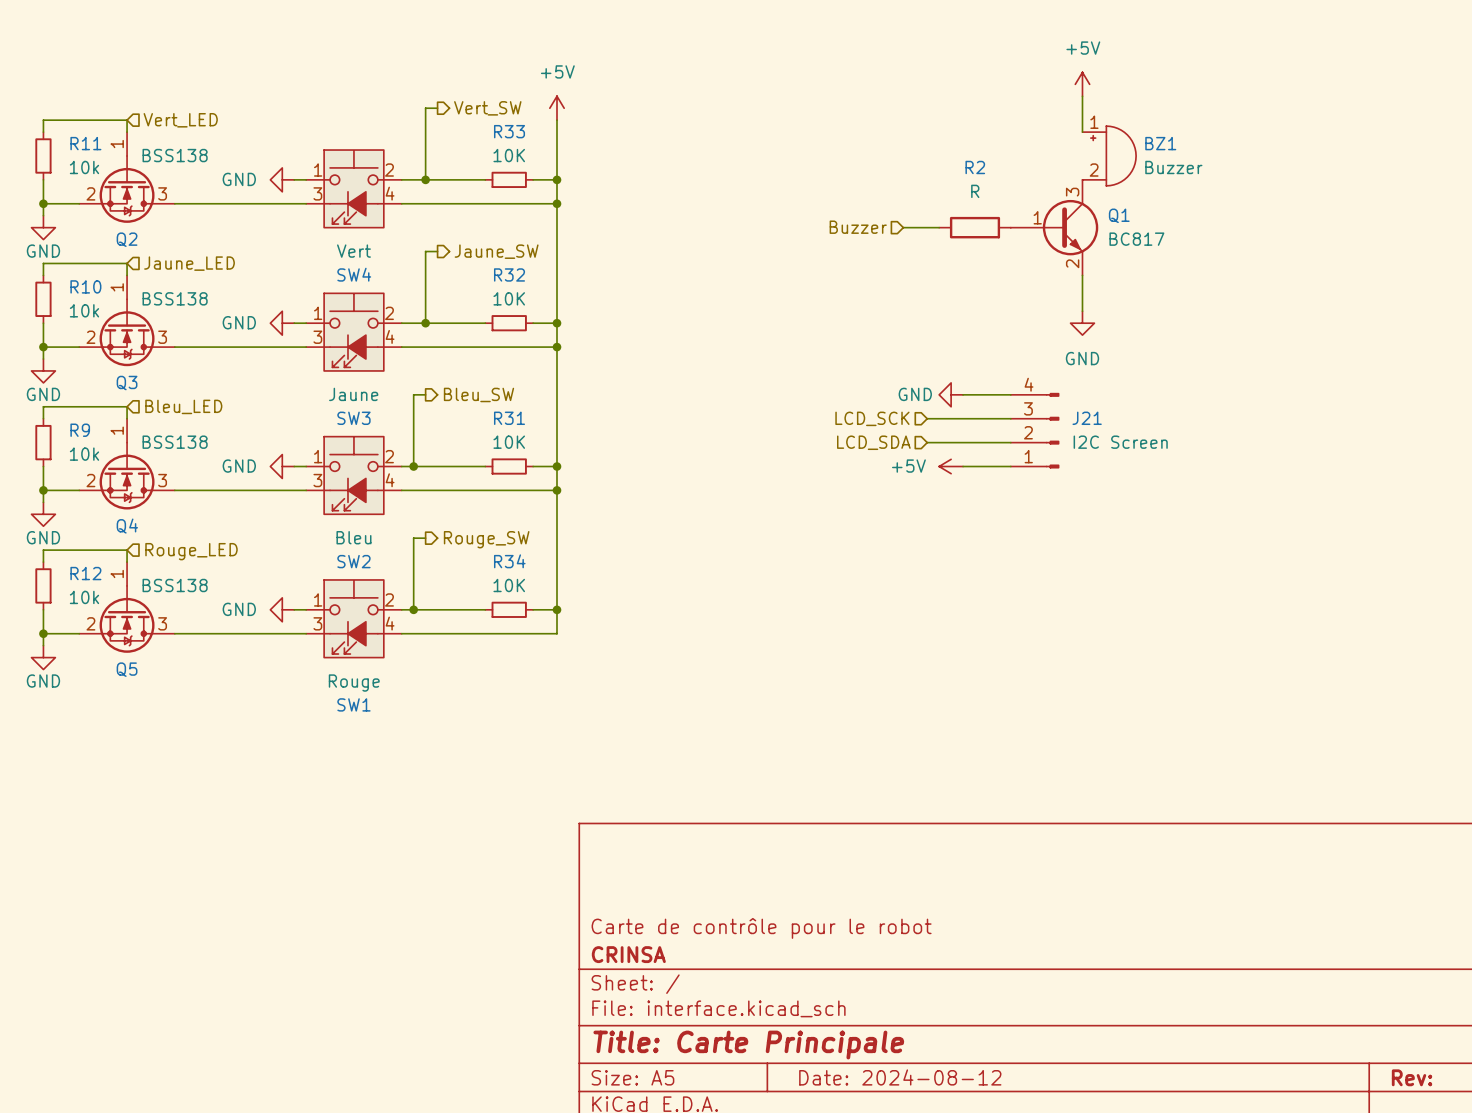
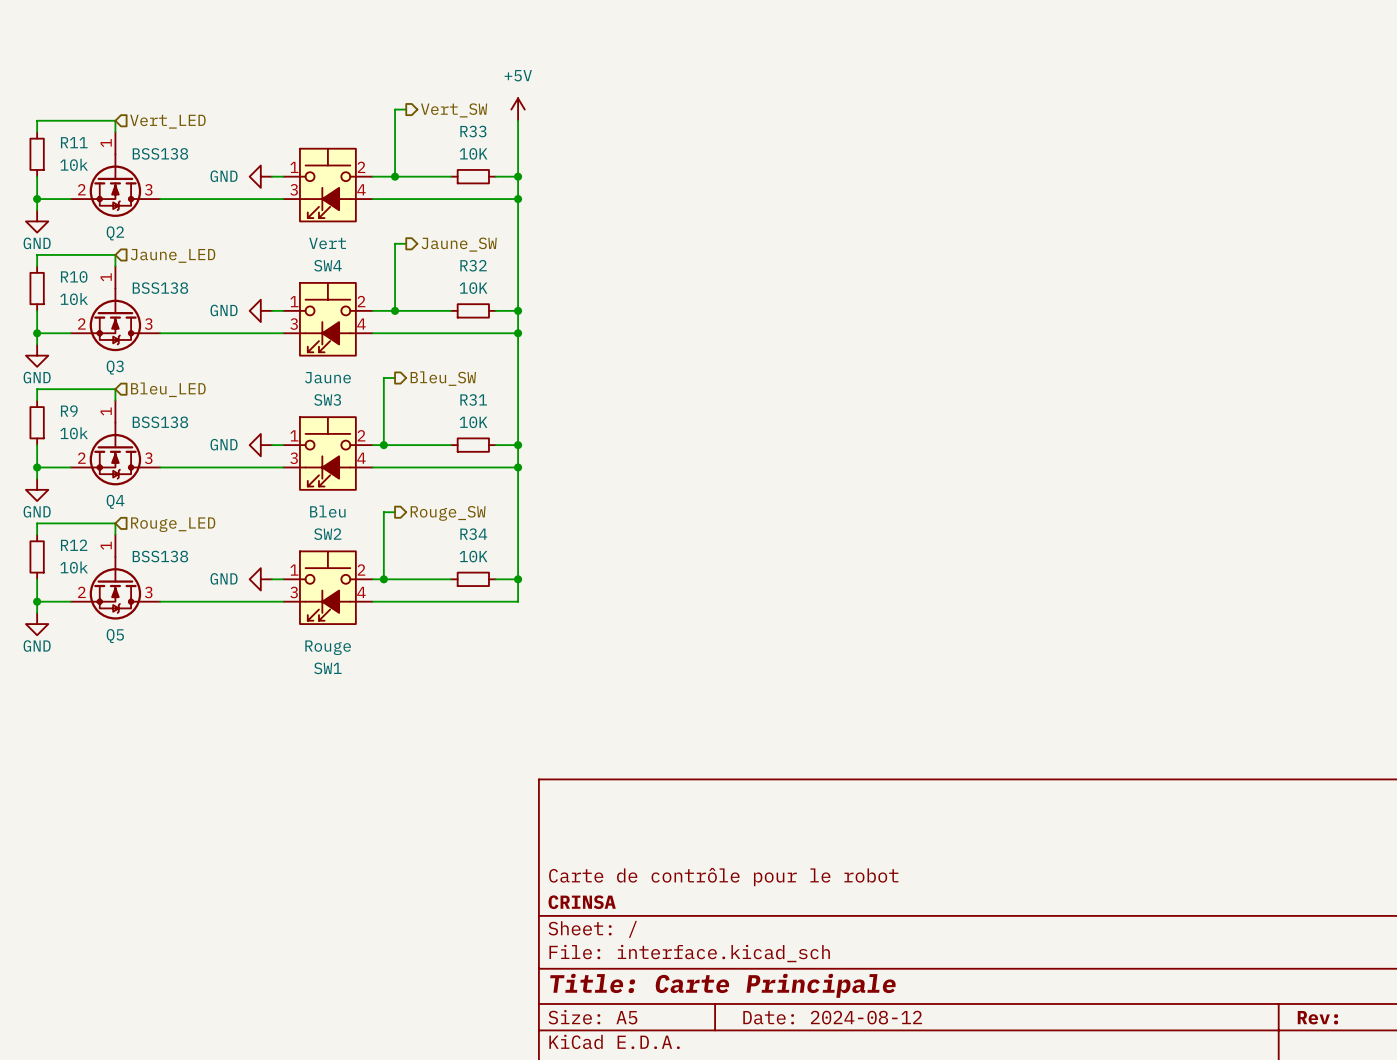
power symbol: +5V (1082, 84) -> none
wire: (1082, 96) (1082, 132) -> none
BZ1: Buzzer (1109, 155) -> none
hierarchical label: Buzzer (858, 227) -> none
wire: (903, 227) (939, 227) -> none
R2: R (975, 227) -> none
Q1: BC817 (1054, 227) -> none
wire: (1082, 275) (1082, 311) -> none
power symbol: GND (1082, 323) -> none
power symbol: GND (951, 394) -> none
wire: (963, 394) (1010, 394) -> none
hierarchical label: LCD_SCK (872, 418) -> none
wire: (927, 418) (1010, 418) -> none
J21: I2C Screen (1035, 430) -> none
hierarchical label: LCD_SDA (873, 442) -> none
wire: (927, 442) (1010, 442) -> none
power symbol: +5V (951, 466) -> none
wire: (963, 466) (1010, 466) -> none

